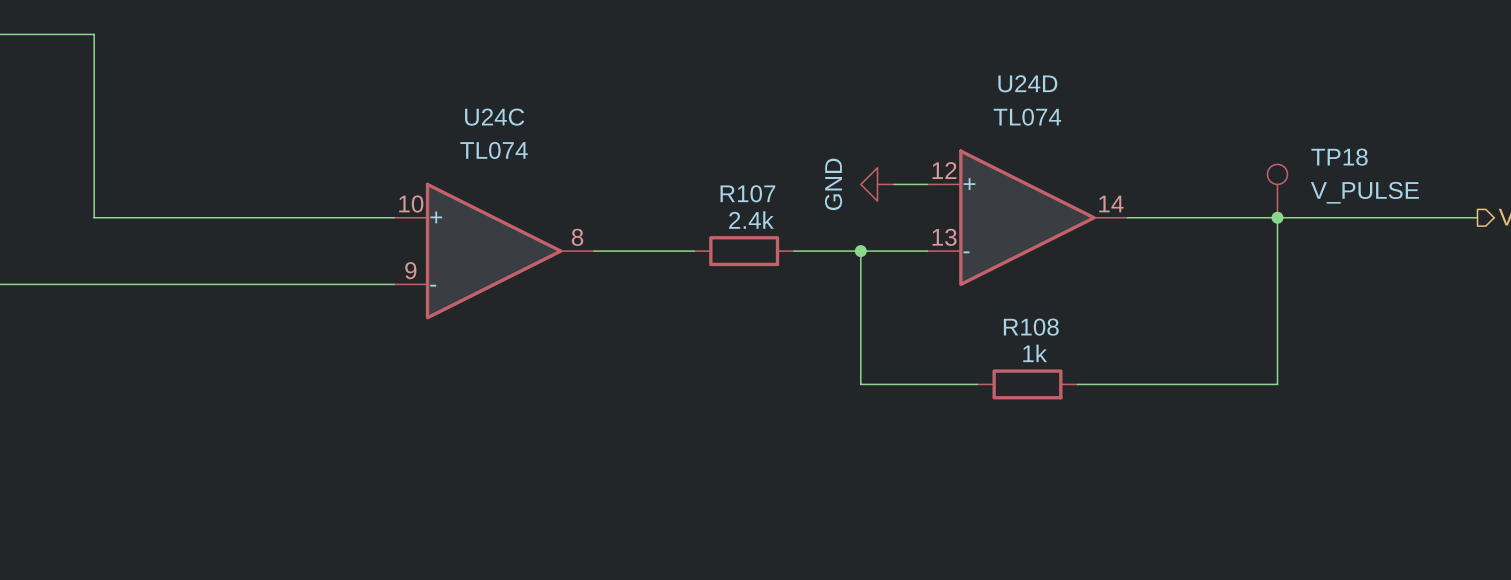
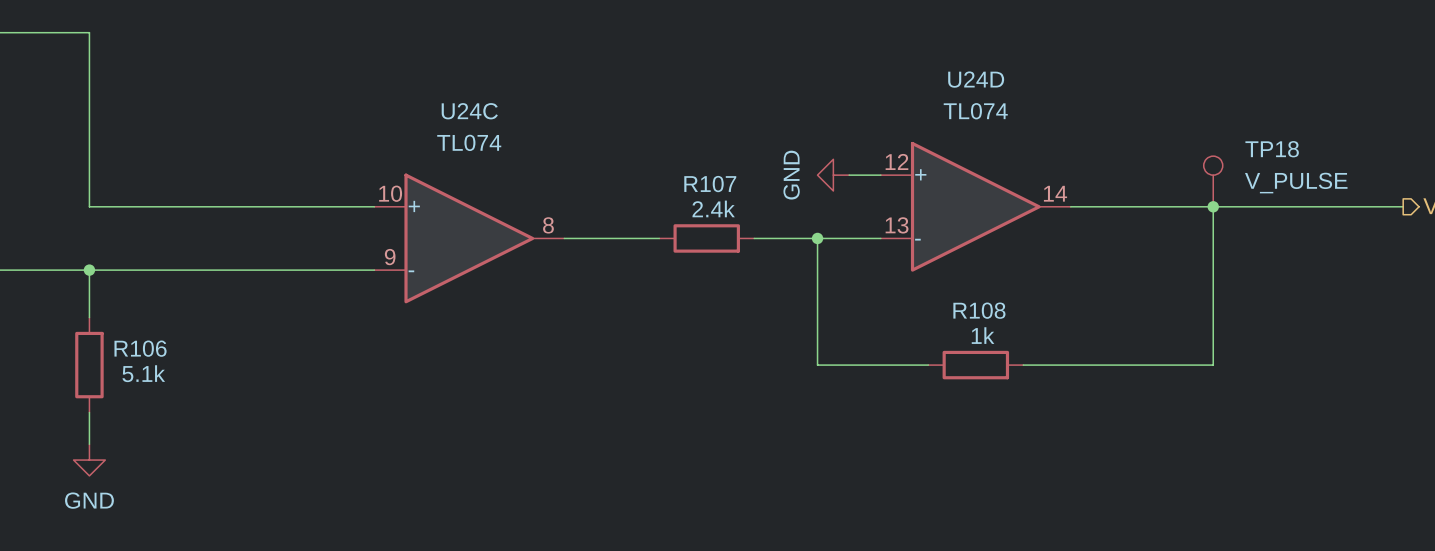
wire: none -> (89, 270) (89, 317)
junction: none -> (89, 270)
R106: none -> 5.1k (89, 365)
wire: none -> (89, 412) (89, 444)
power symbol: none -> GND (89, 460)

